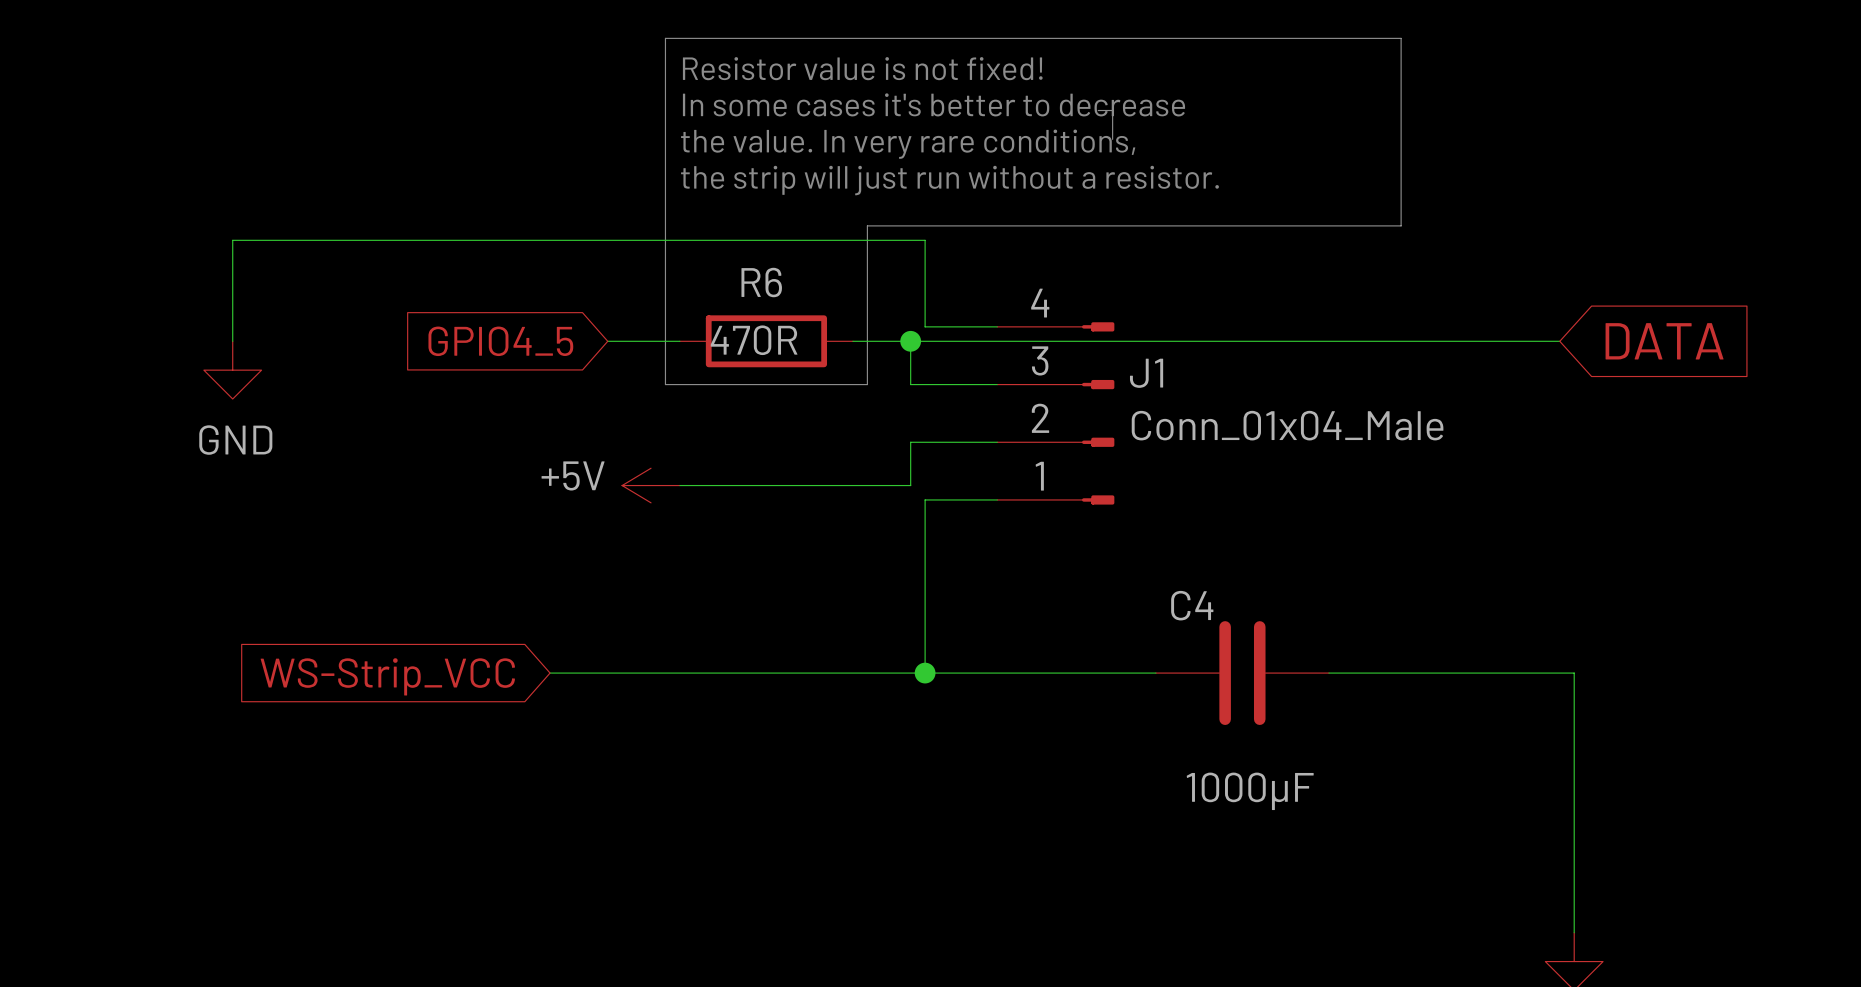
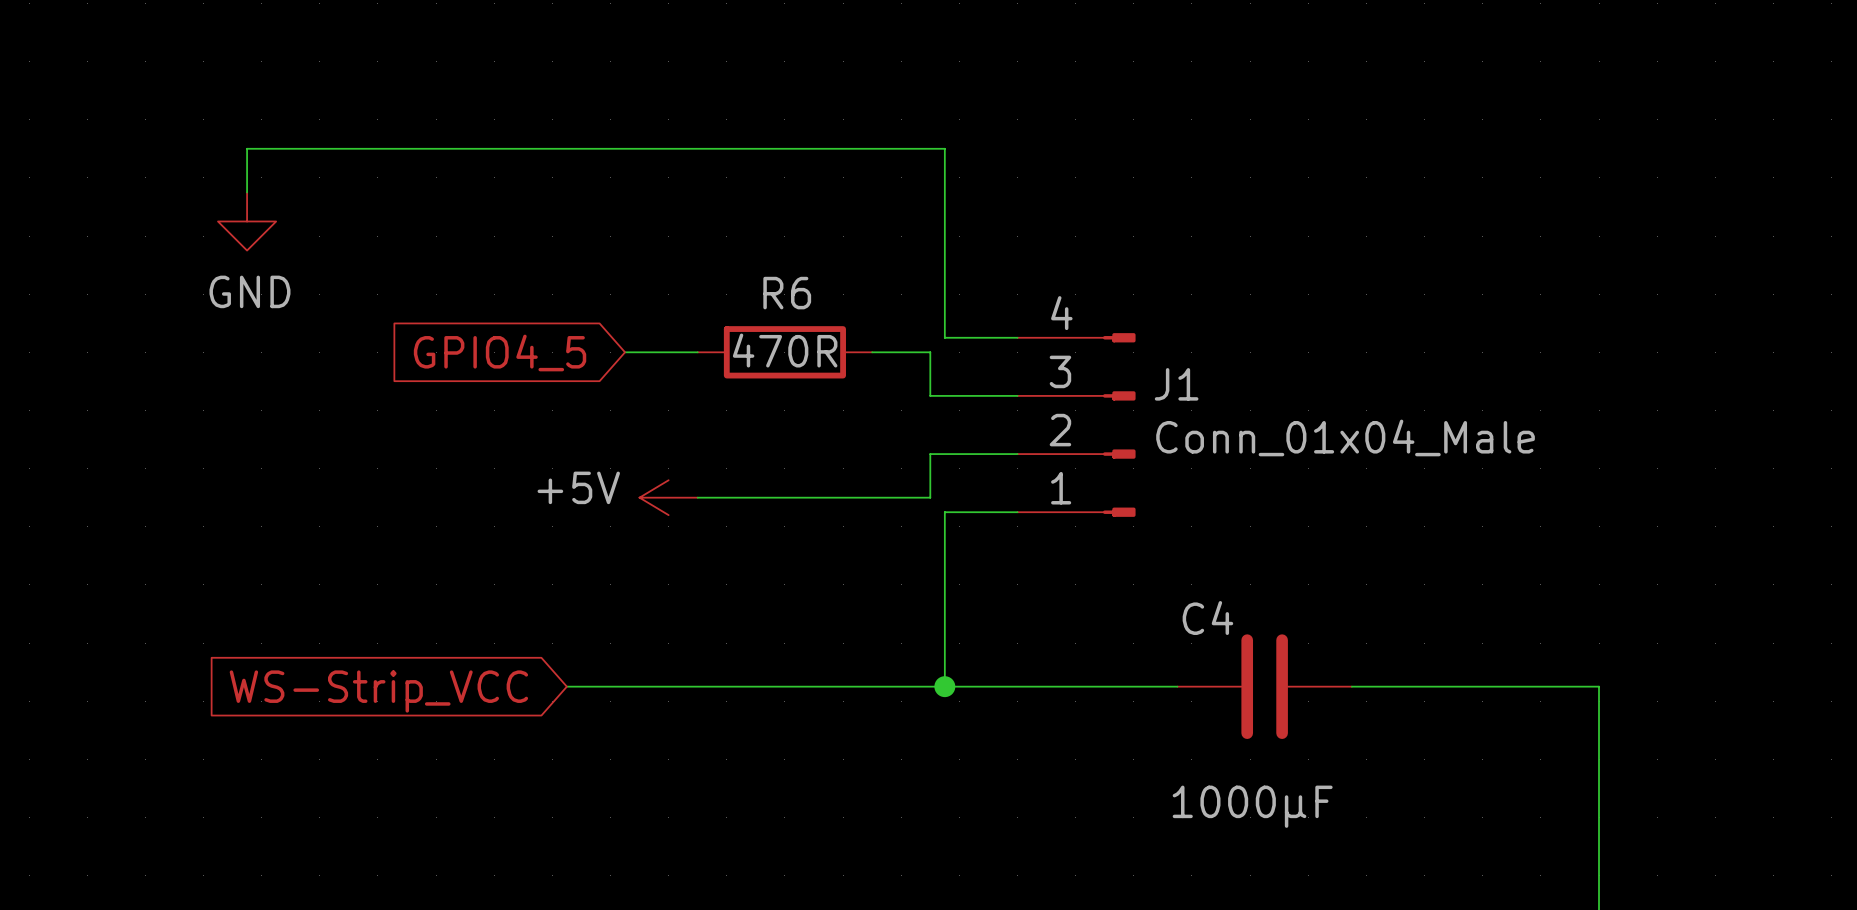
line: (665, 38) (665, 384) (867, 384) (867, 225) (1401, 225) (1401, 38) (665, 38) -> none
text: Resistor value is not fixed! (862, 68) -> none
text: In some cases it's better to decrease (933, 104) -> none
line: (1098, 110) (1112, 110) (1112, 139) -> none
text: the value. In very rare conditions, (908, 144) -> none
text: the strip will just run without a resistor. (949, 180) -> none
wire: (925, 240) (232, 240) (232, 341) -> (944, 250) (944, 148) (247, 148) (247, 192)
wire: (910, 341) (1559, 341) -> none
junction: (910, 341) -> none
global label: DATA (1664, 341) -> none
power symbol position: GND (232, 370) -> GND (247, 221)

